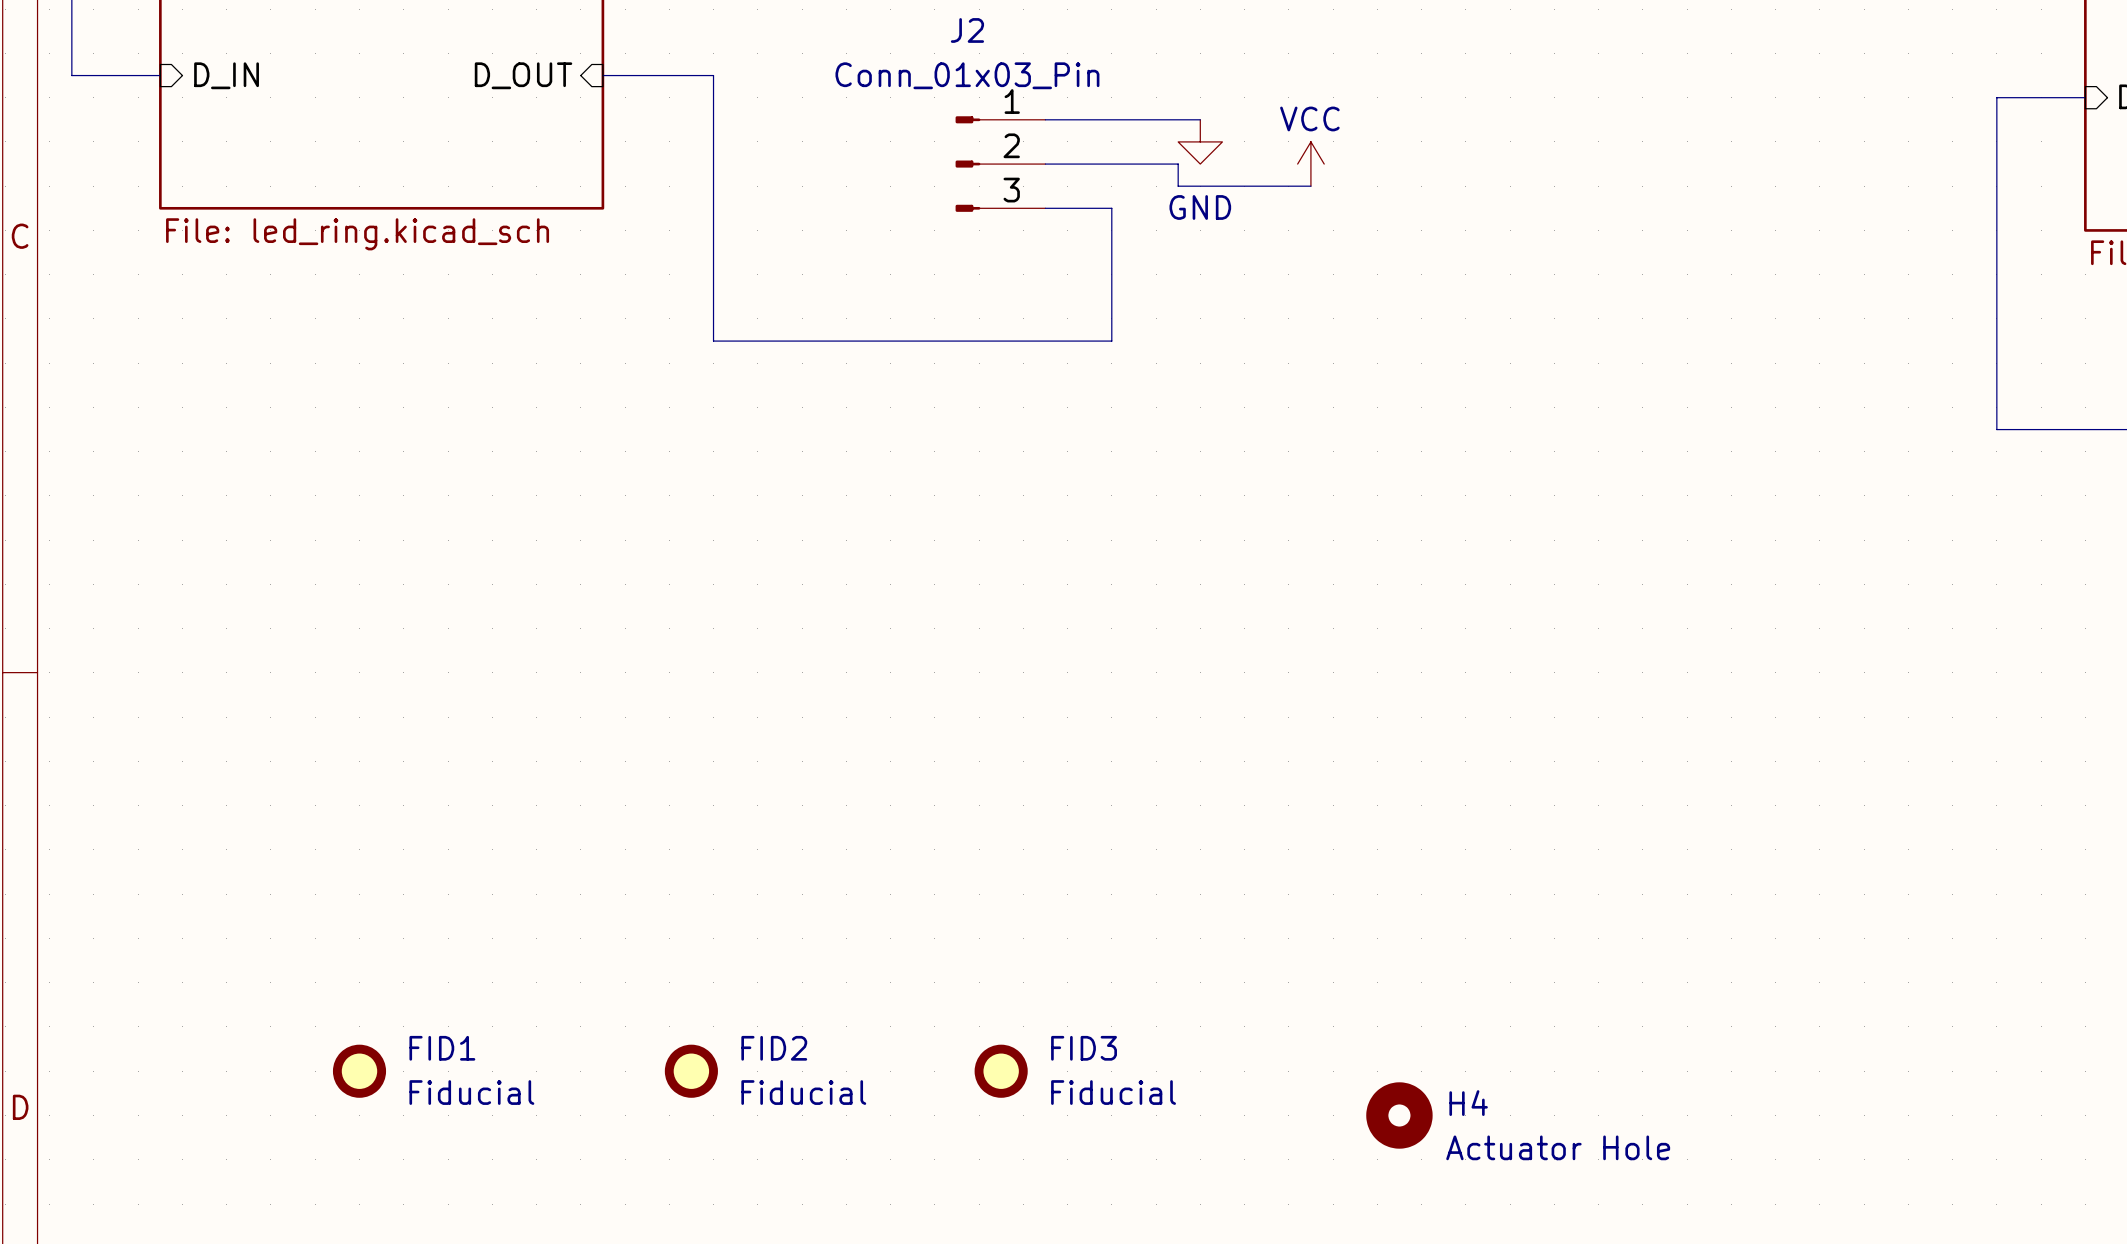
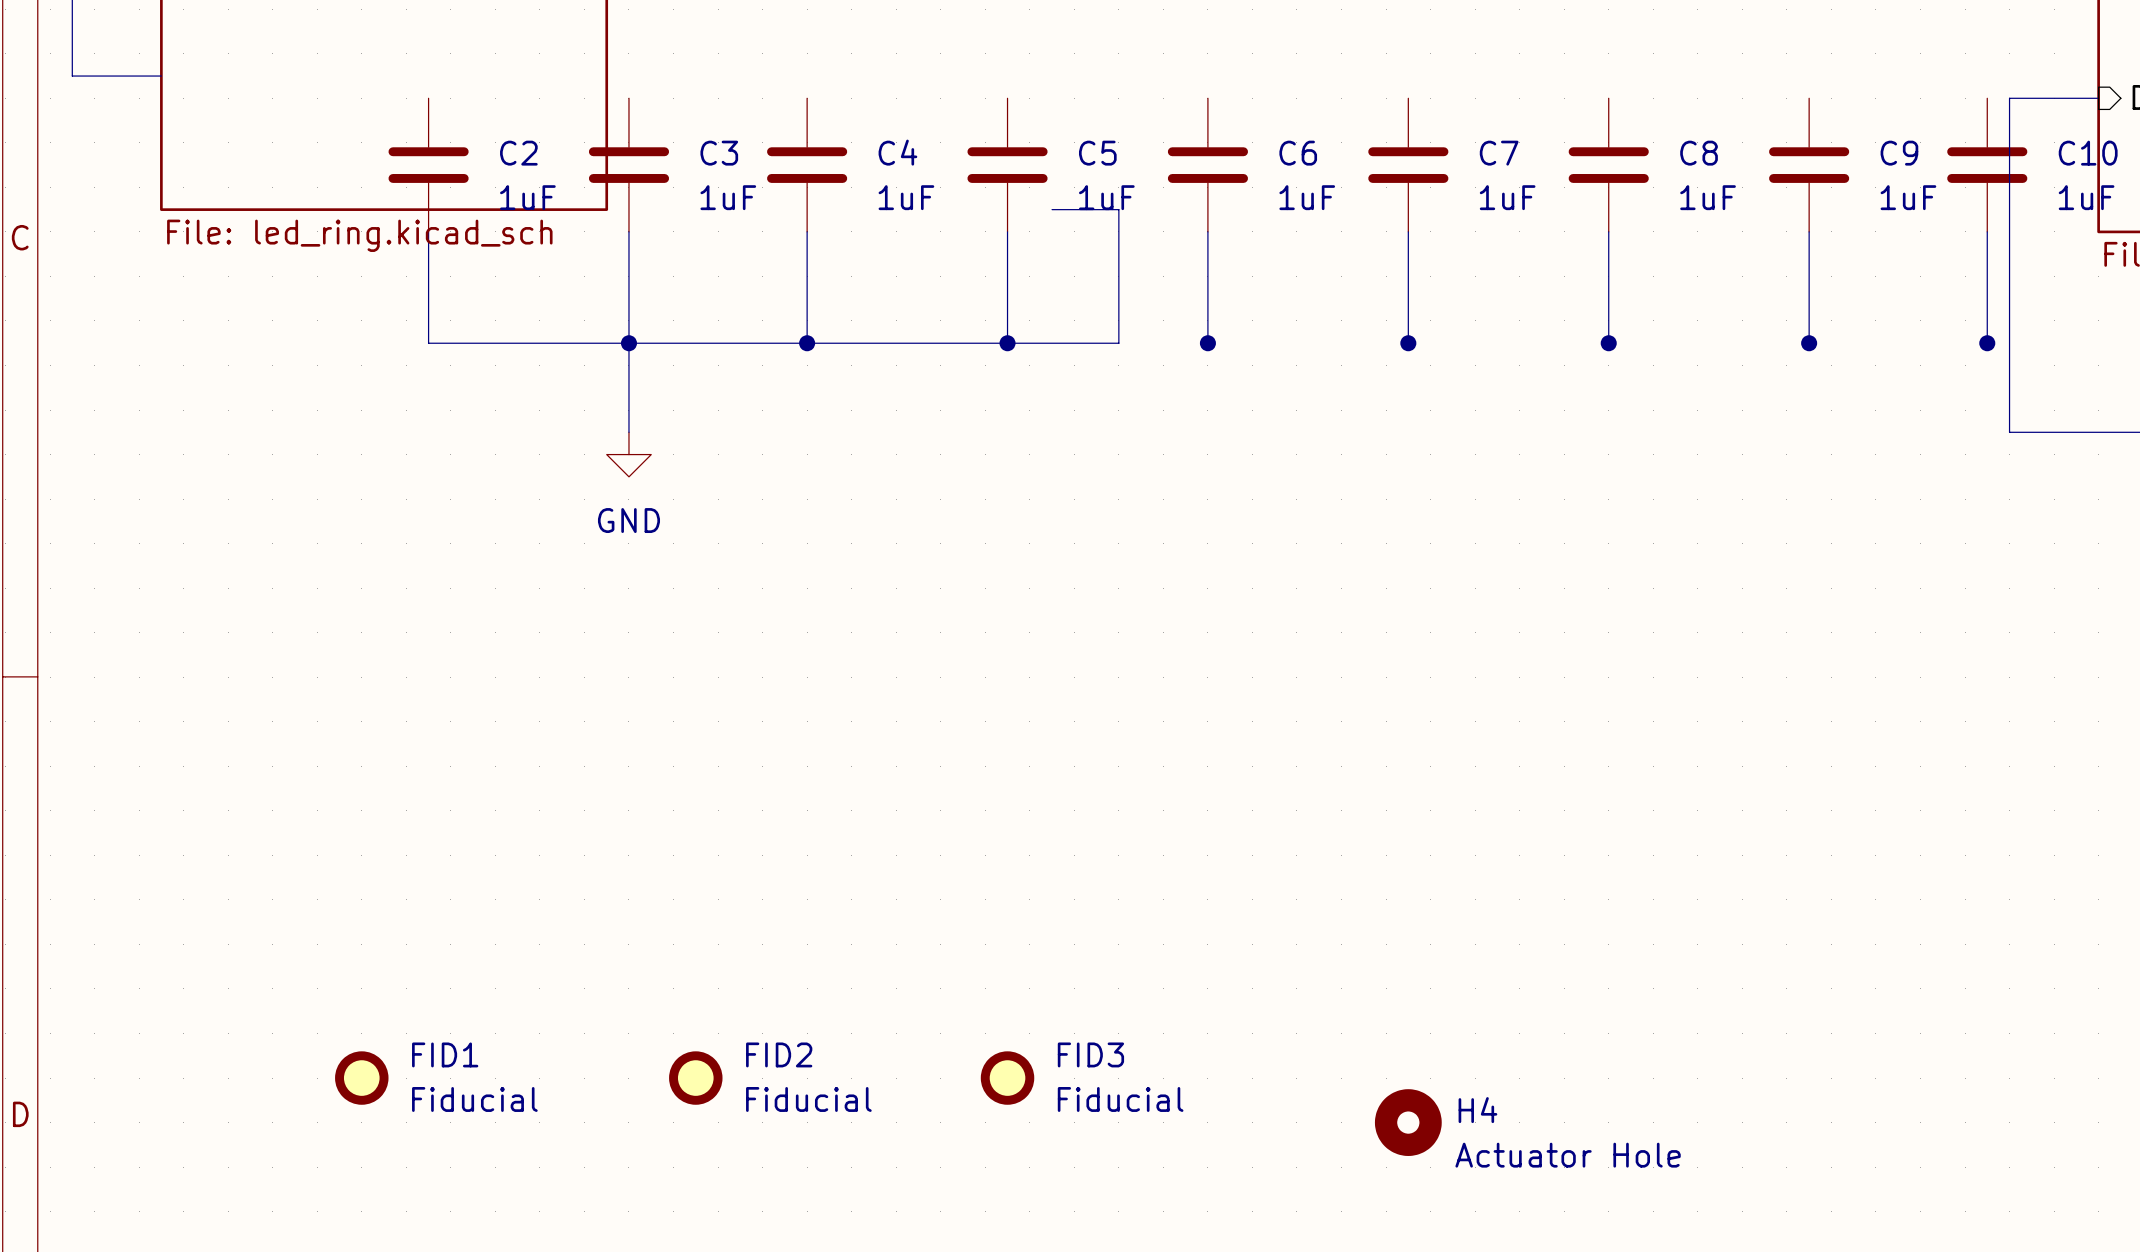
sheet pin: D_IN (226, 75) -> none
sheet pin: D_OUT (523, 75) -> none
wire: (602, 75) (713, 75) (713, 341) -> (428, 231) (428, 343) (718, 343)
wire: (1045, 119) (1200, 119) -> none
power symbol: GND (1200, 141) -> none
C2: none -> 1uF (428, 165)
C3: none -> 1uF (628, 165)
C4: none -> 1uF (807, 165)
J2: Conn_01x03_Pin (1000, 164) -> none
C5: none -> 1uF (1007, 165)
wire: (1045, 164) (1178, 164) (1178, 186) (1310, 186) -> none
C6: none -> 1uF (1207, 165)
power symbol: VCC (1310, 164) -> none
C7: none -> 1uF (1408, 165)
C8: none -> 1uF (1608, 165)
C9: none -> 1uF (1809, 165)
C10: none -> 1uF (1987, 165)
wire: none -> (628, 231) (628, 432)
wire: none -> (807, 231) (807, 343)
wire: none -> (1007, 231) (1007, 343)
wire: none -> (1207, 231) (1207, 343)
wire: none -> (1408, 231) (1408, 343)
wire: none -> (1608, 231) (1608, 343)
wire: none -> (1809, 231) (1809, 343)
wire: none -> (1987, 231) (1987, 343)
junction: none -> (628, 343)
junction: none -> (807, 343)
junction: none -> (1007, 343)
junction: none -> (1207, 343)
junction: none -> (1408, 343)
junction: none -> (1608, 343)
junction: none -> (1809, 343)
junction: none -> (1987, 343)
power symbol: none -> GND (628, 454)

